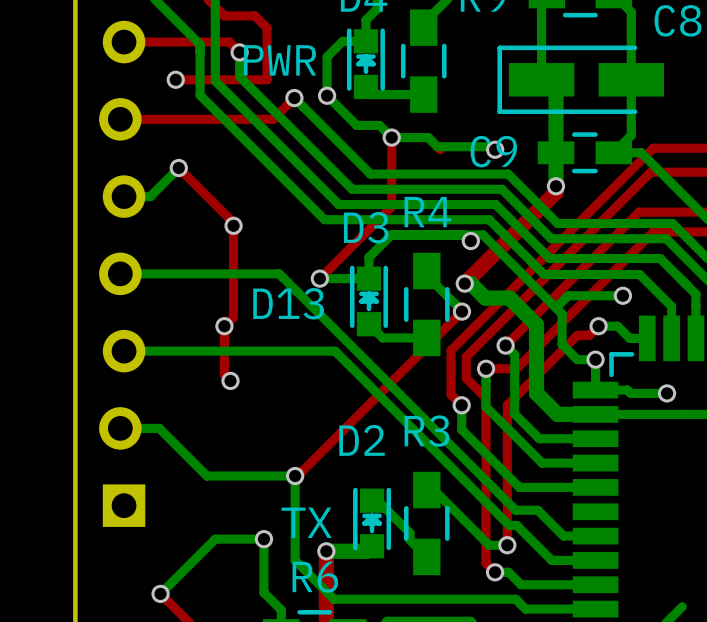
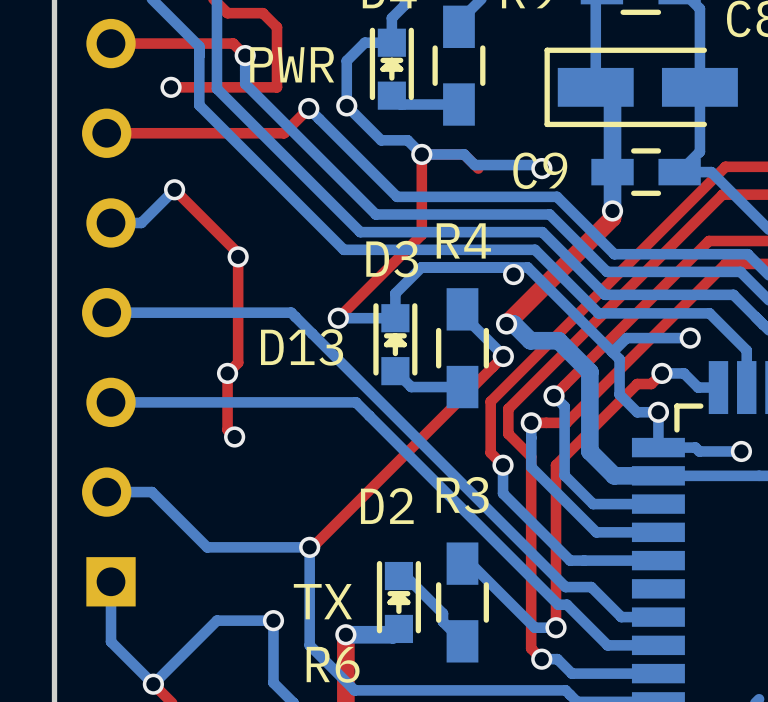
bottom track: none -> (111, 581) (111, 641) (153, 684)

